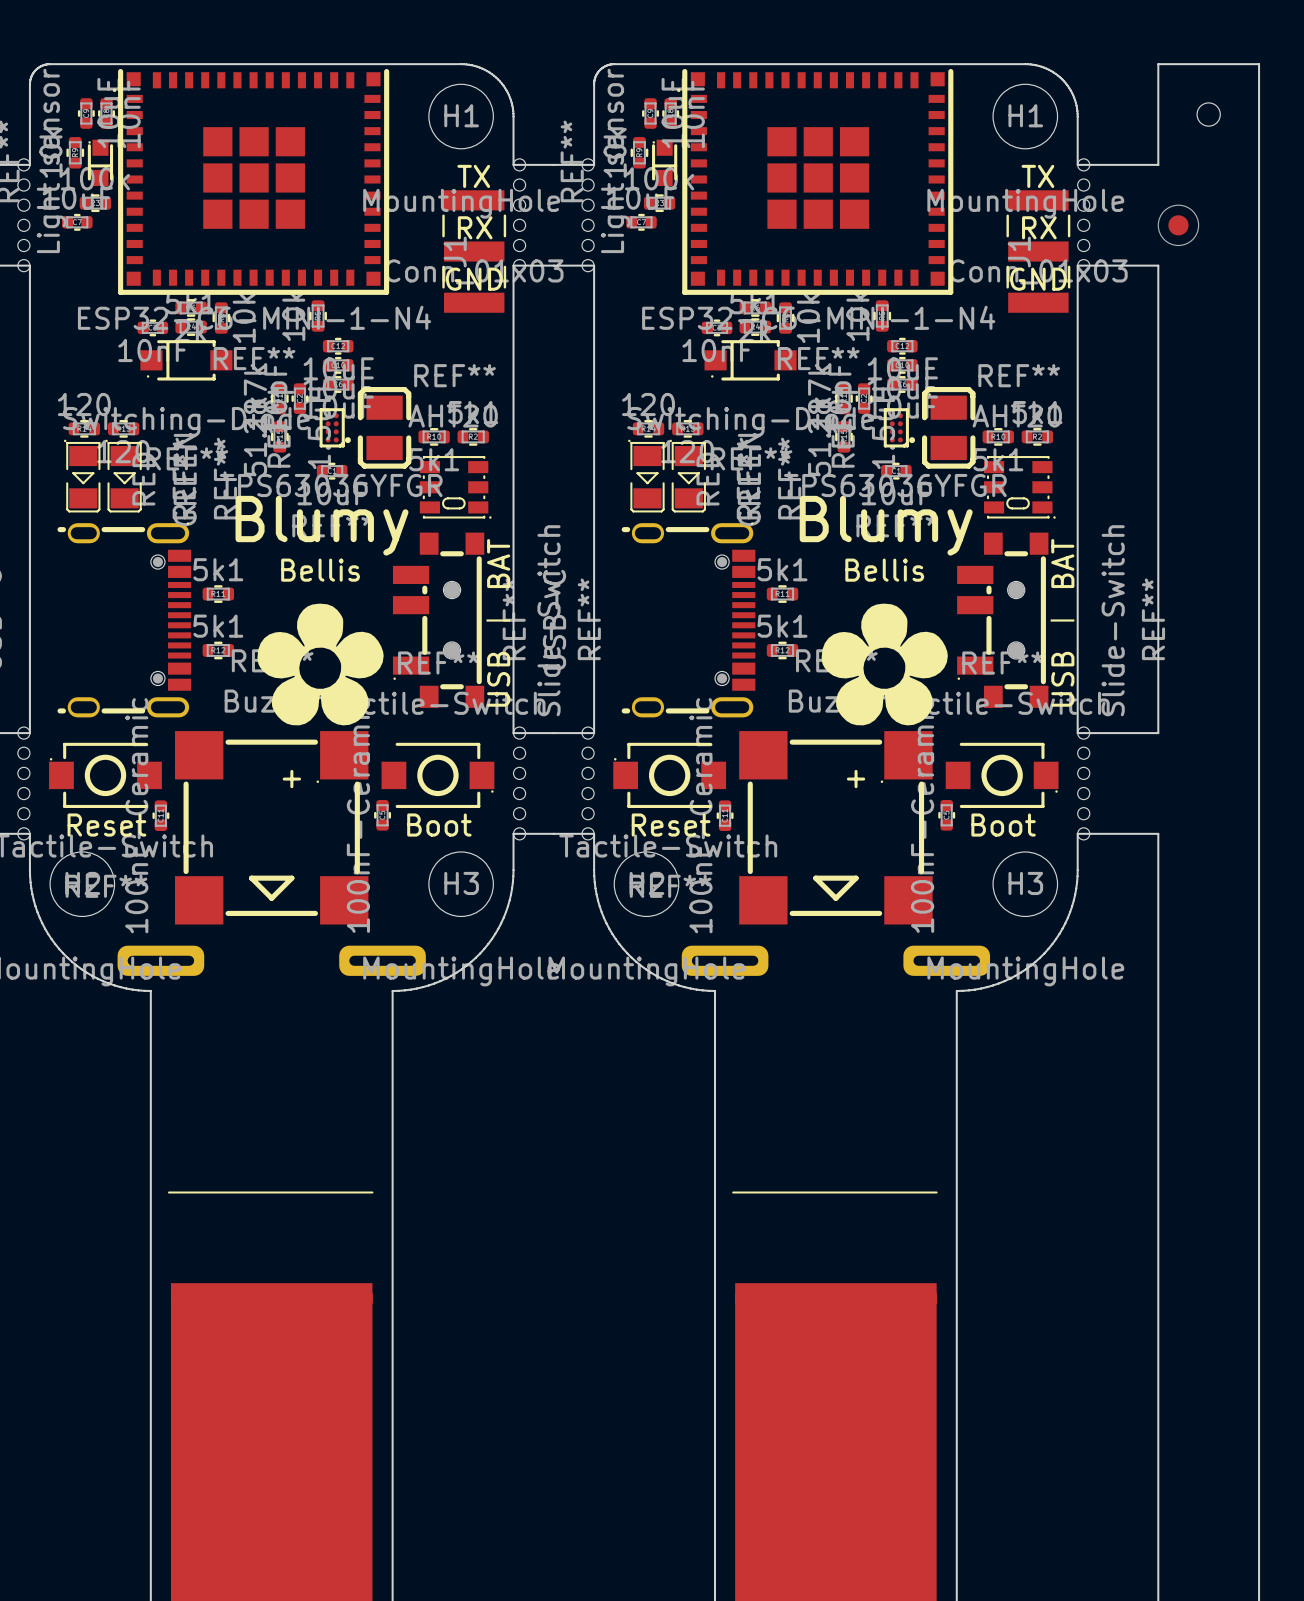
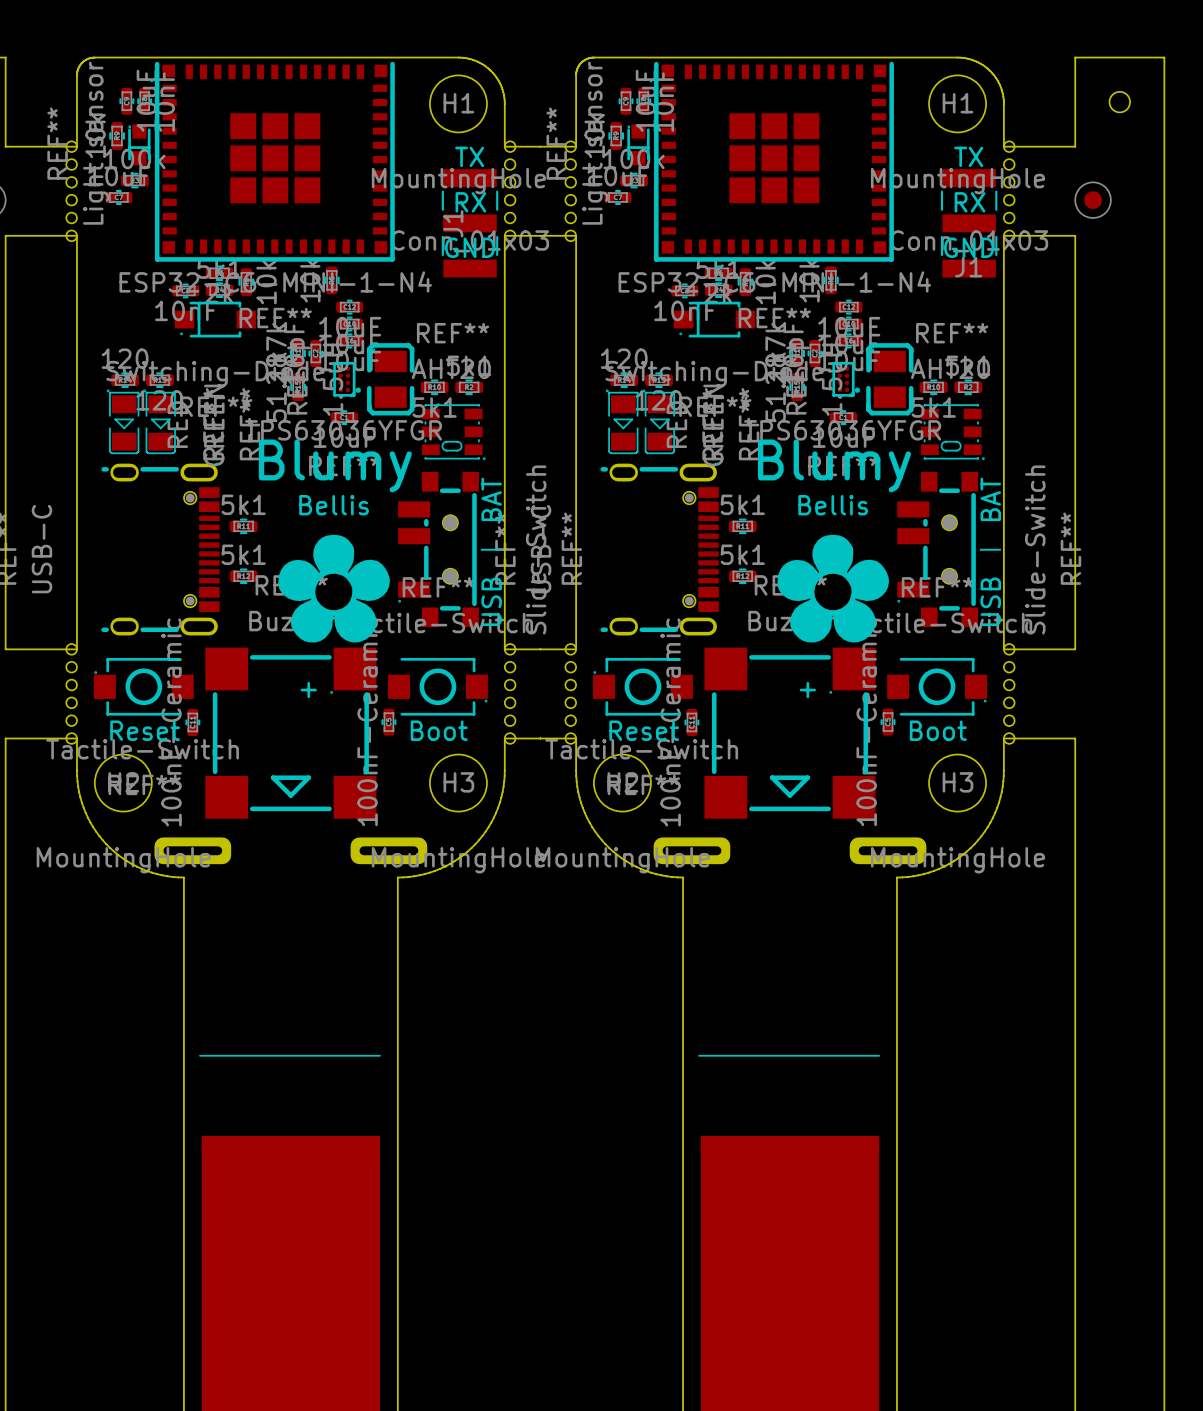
J1 name rotation: 0° (1019, 252) -> 90° clockwise (968, 267)
J1 name position: J1 (1019, 252) -> J1 (968, 267)

